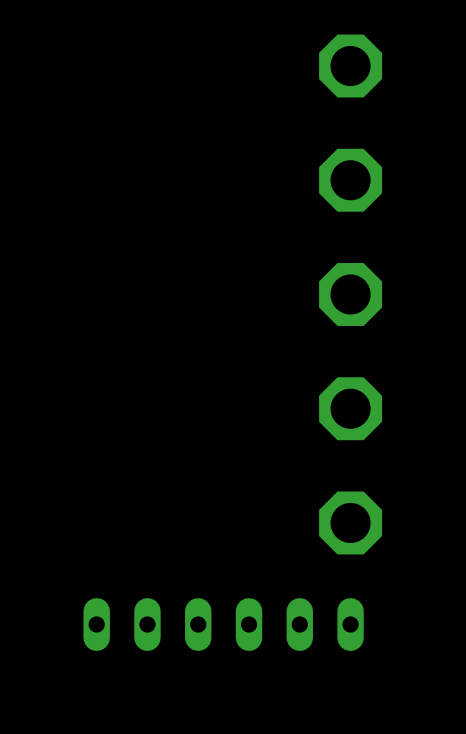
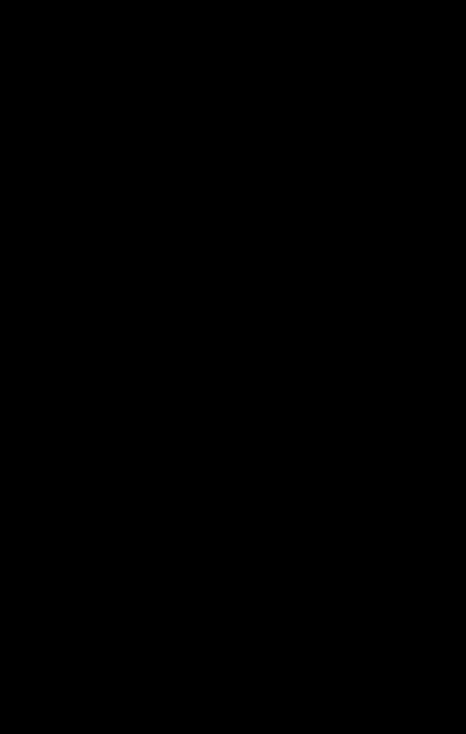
part: (350, 66) -> none
part: (350, 180) -> none
part: (350, 294) -> none
part: (350, 408) -> none
part: (350, 522) -> none
part: (223, 624) -> none

